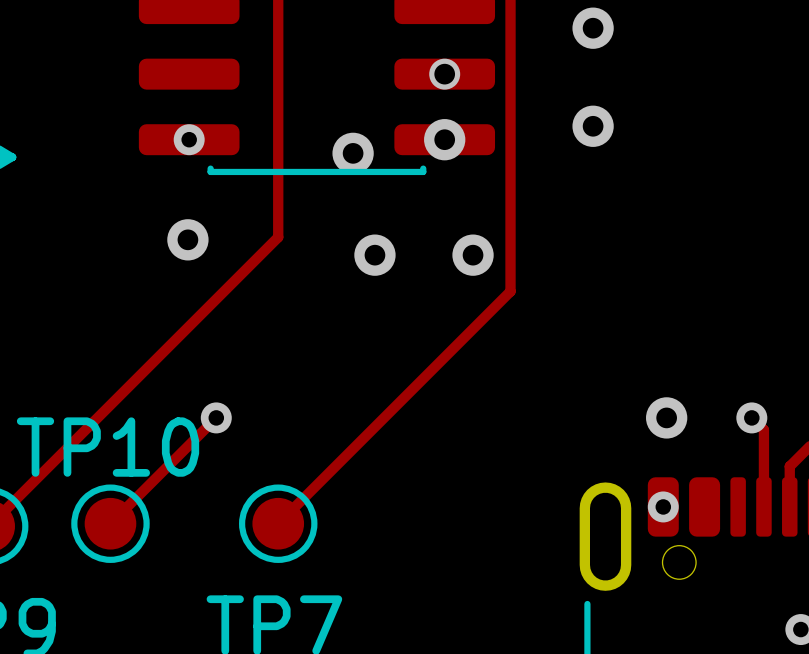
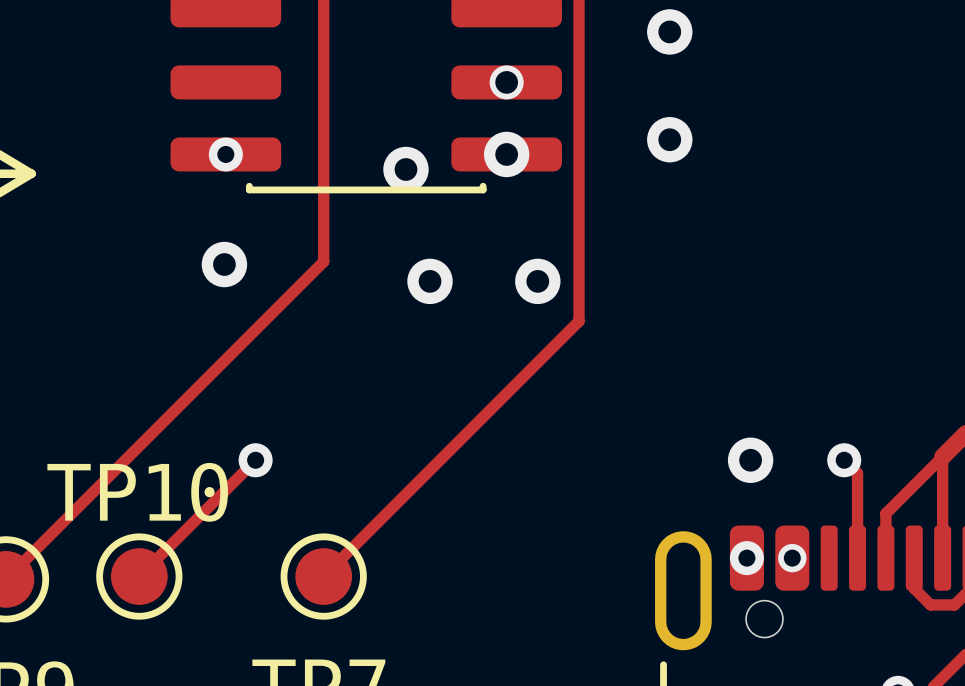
via: none -> (792, 558)

